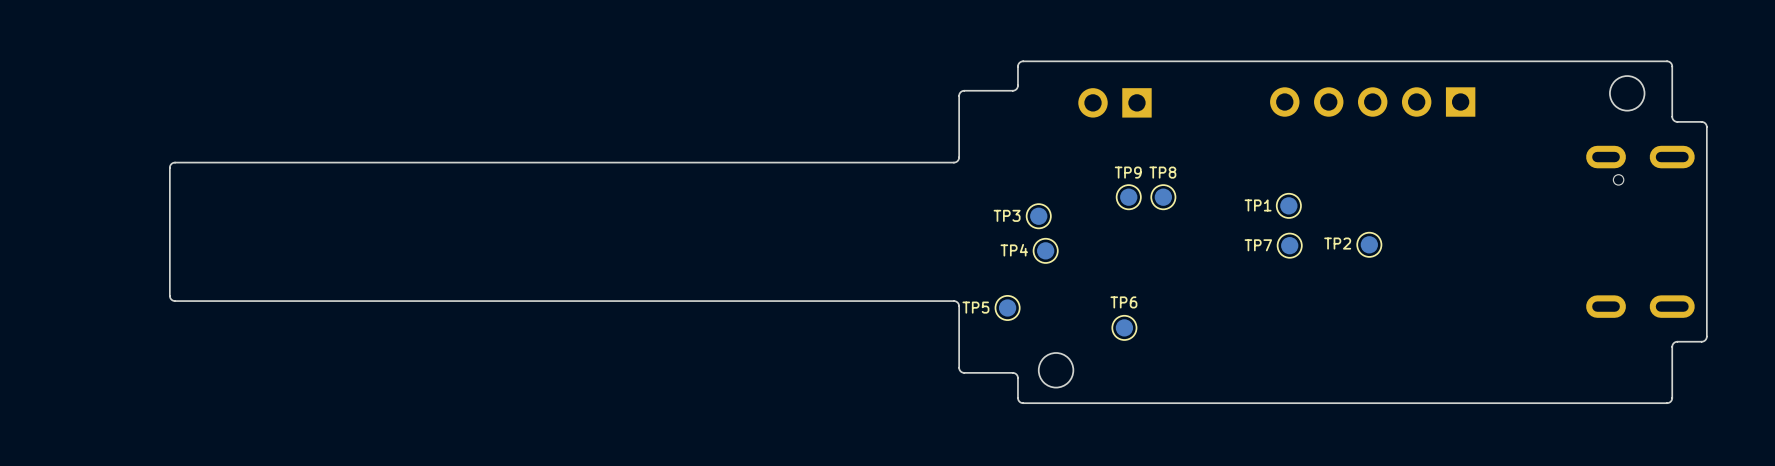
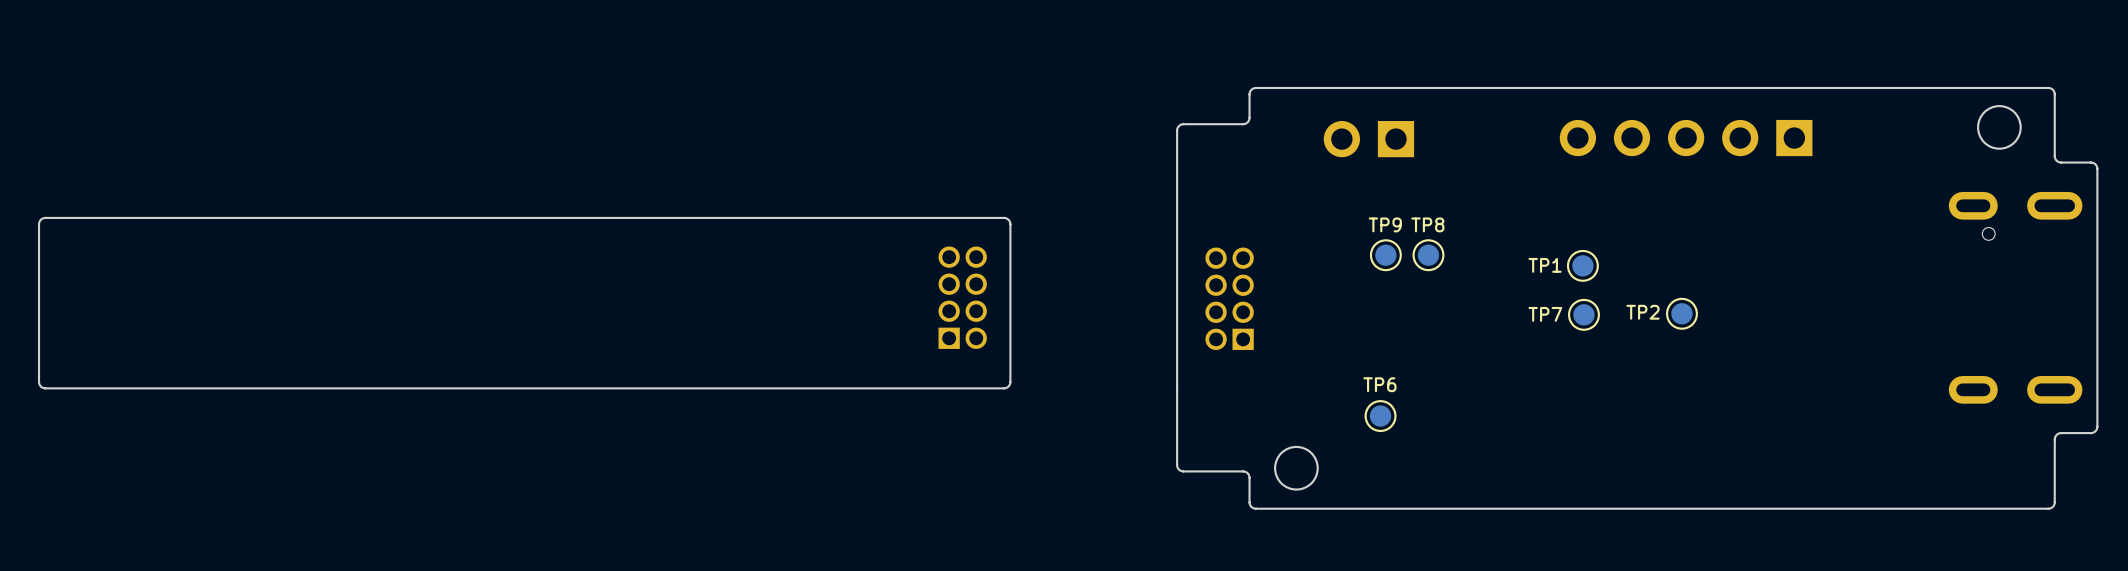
board edge: (959, 157) (957, 161) (953, 162) (175, 162) (171, 164) (169, 167) (169, 295) (174, 301) (953, 301) (957, 302) (959, 306) -> (1177, 206) (1177, 389)
board edge: none -> (1004, 217) (44, 217) (40, 219) (39, 224) (39, 382) (40, 386) (45, 388) (1004, 388) (1008, 386) (1010, 381) (1010, 224) (1008, 219) (1004, 217)
TP3: (1038, 216) -> none
part: none -> (962, 297)
part: none -> (1229, 298)
TP4: (1045, 250) -> none
TP5: (1007, 307) -> none

